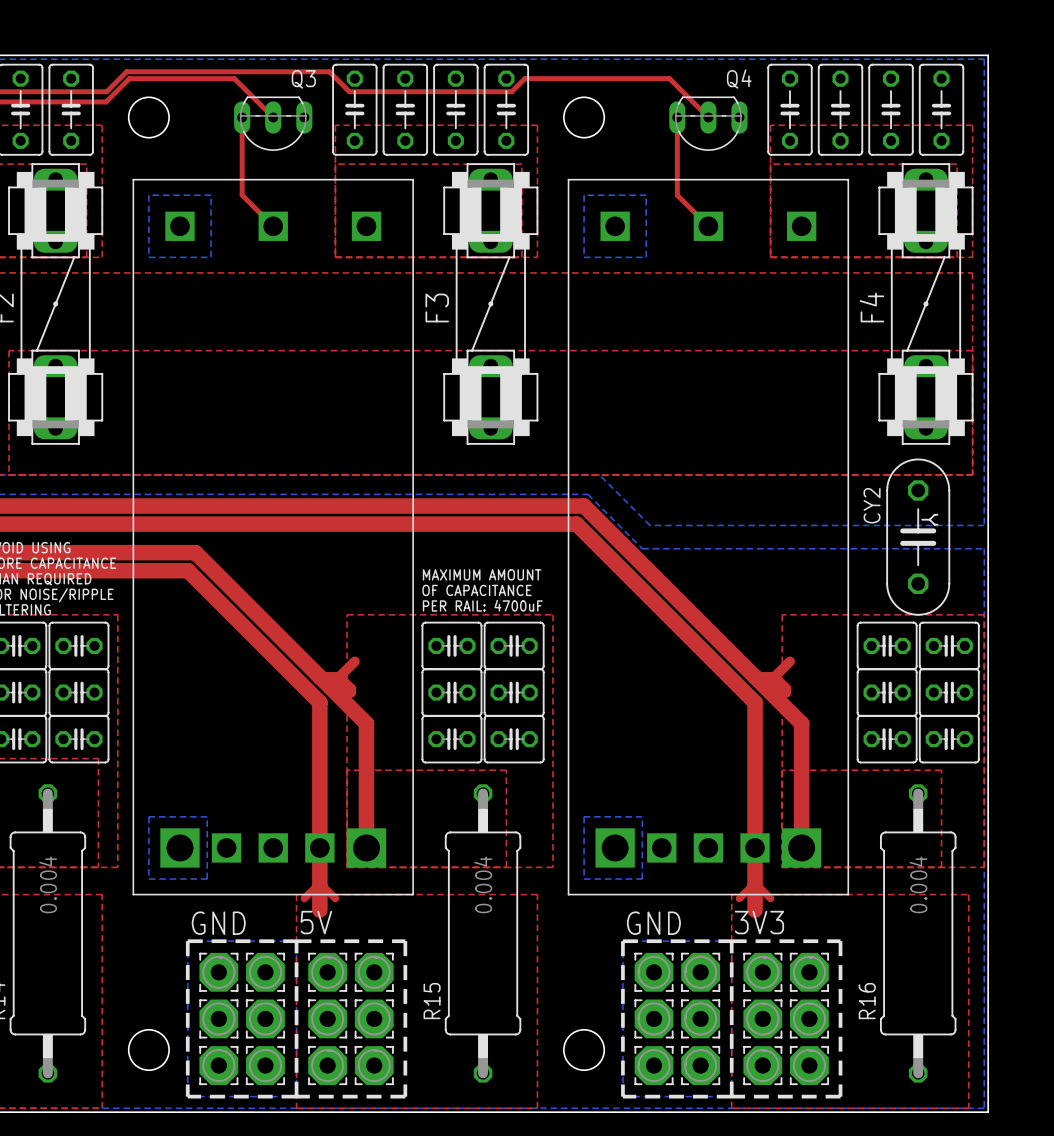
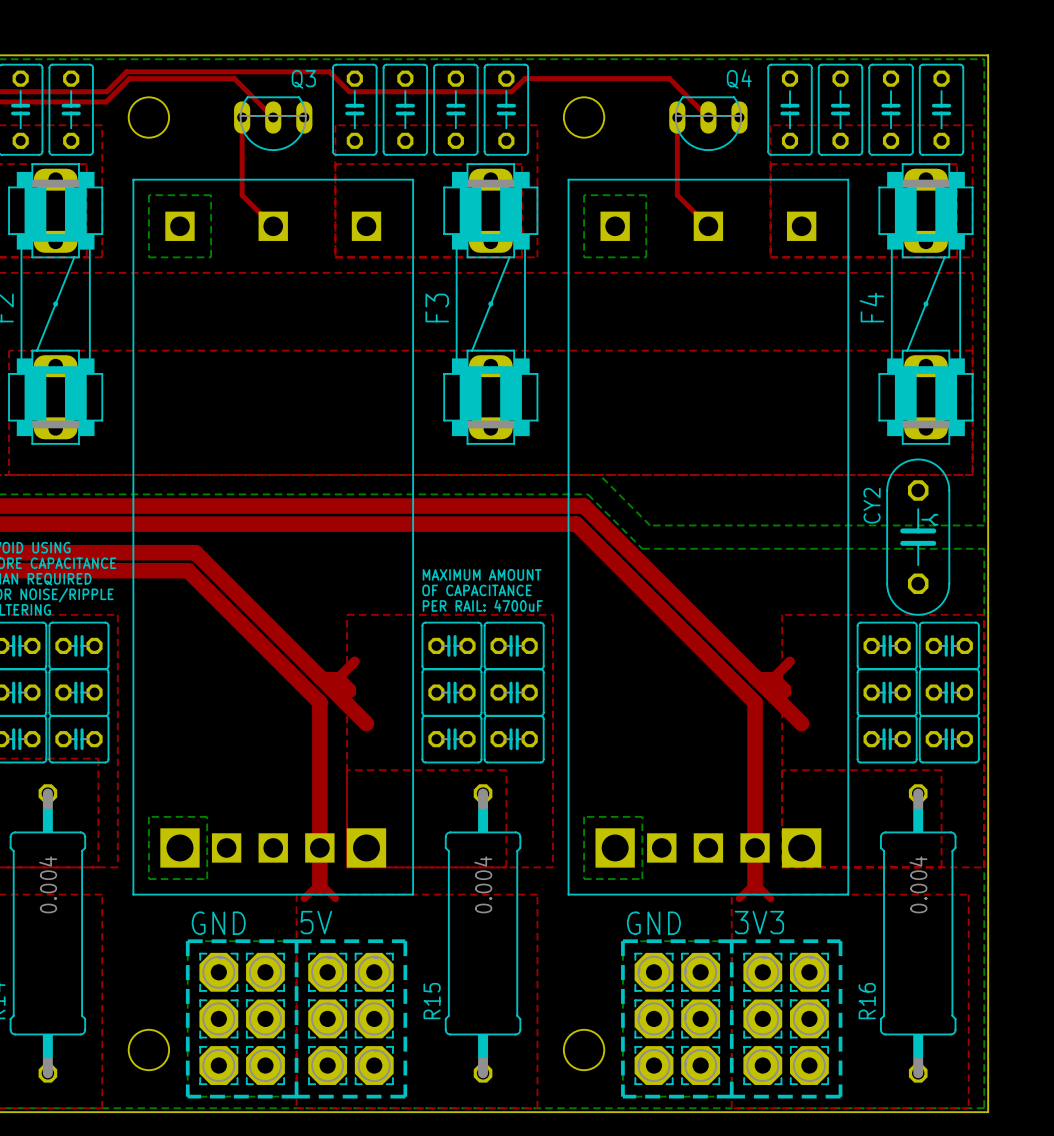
top track: (366, 723) (366, 847) -> none
top track: (801, 723) (801, 847) -> none
top track: (319, 886) (319, 910) -> none
top track: (755, 886) (755, 910) -> none

